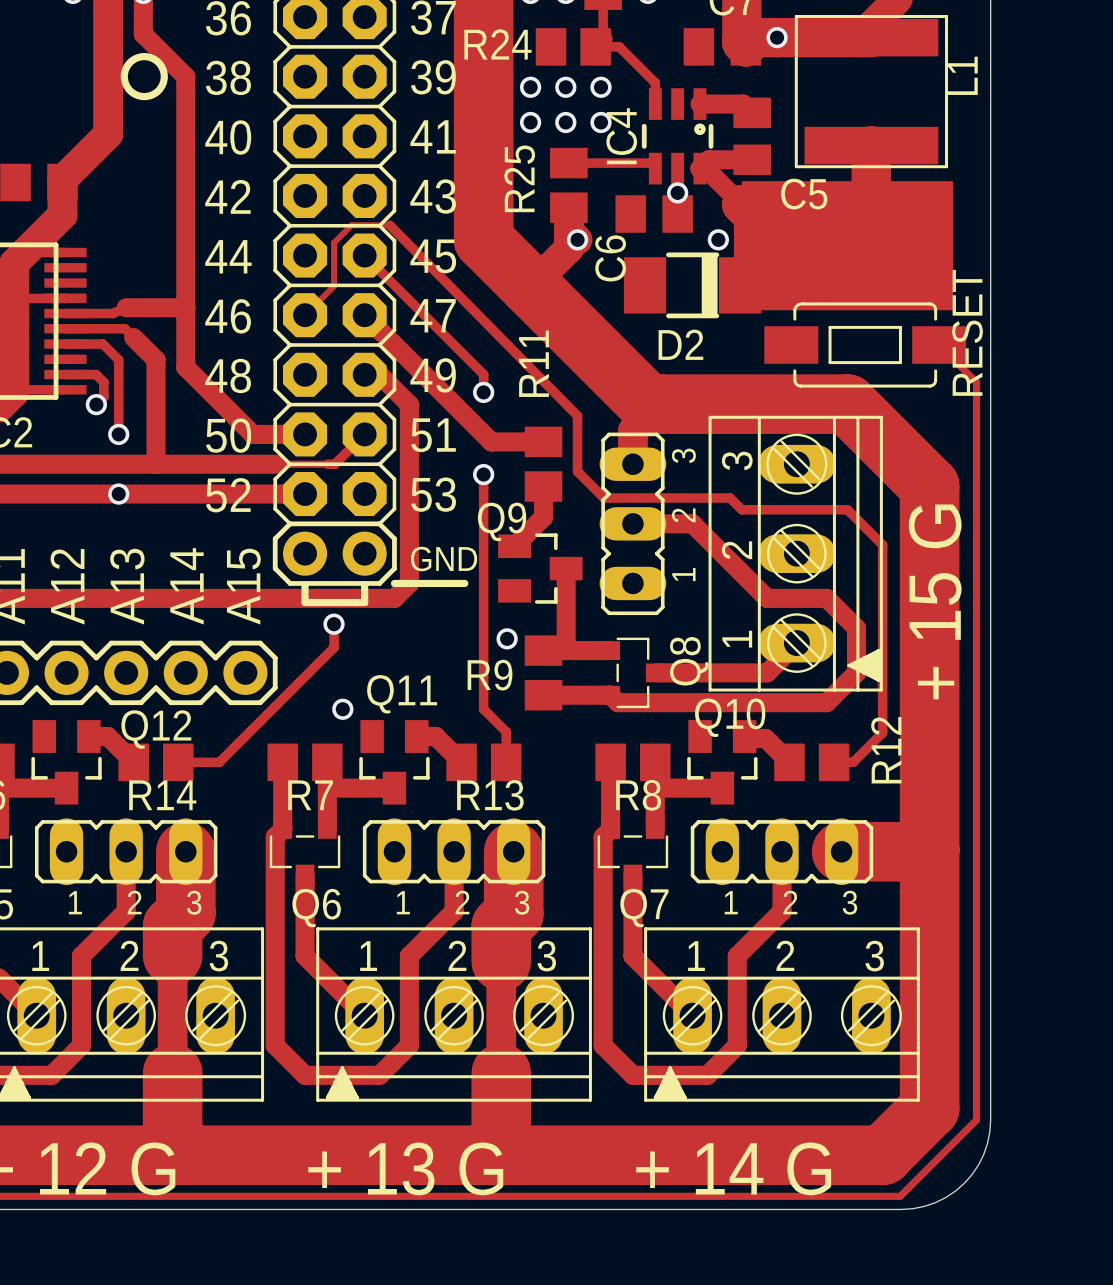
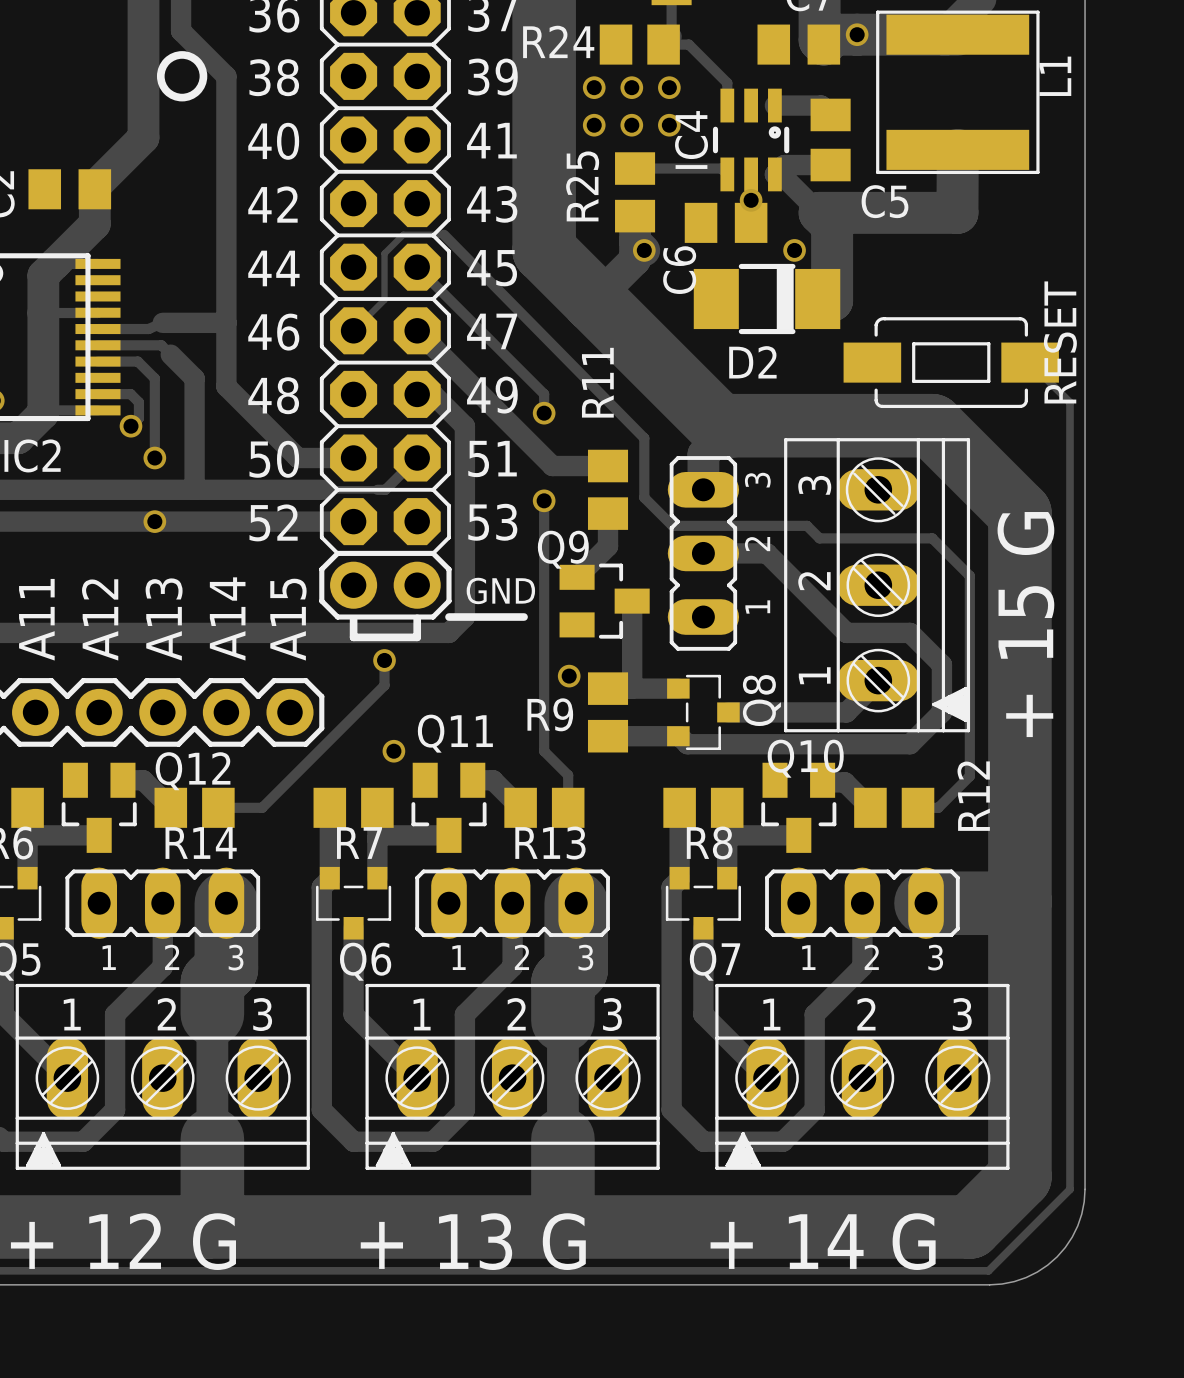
drawing: [741, 181, 954, 311] -> none

